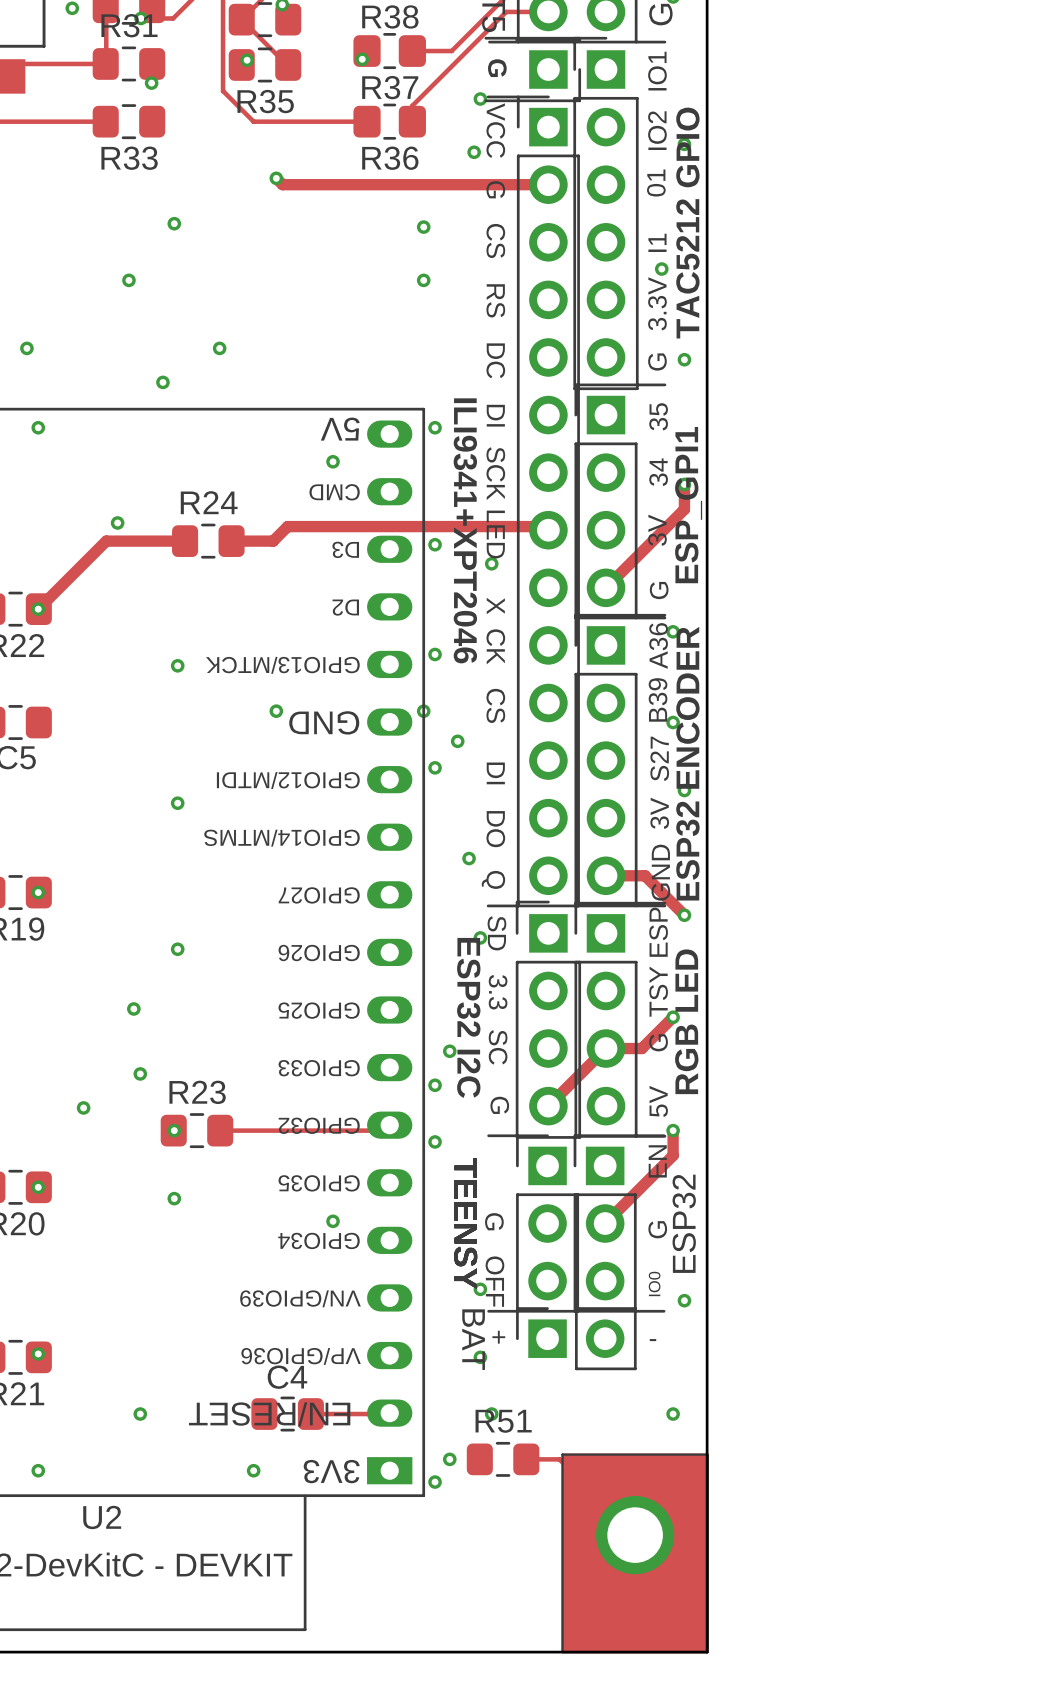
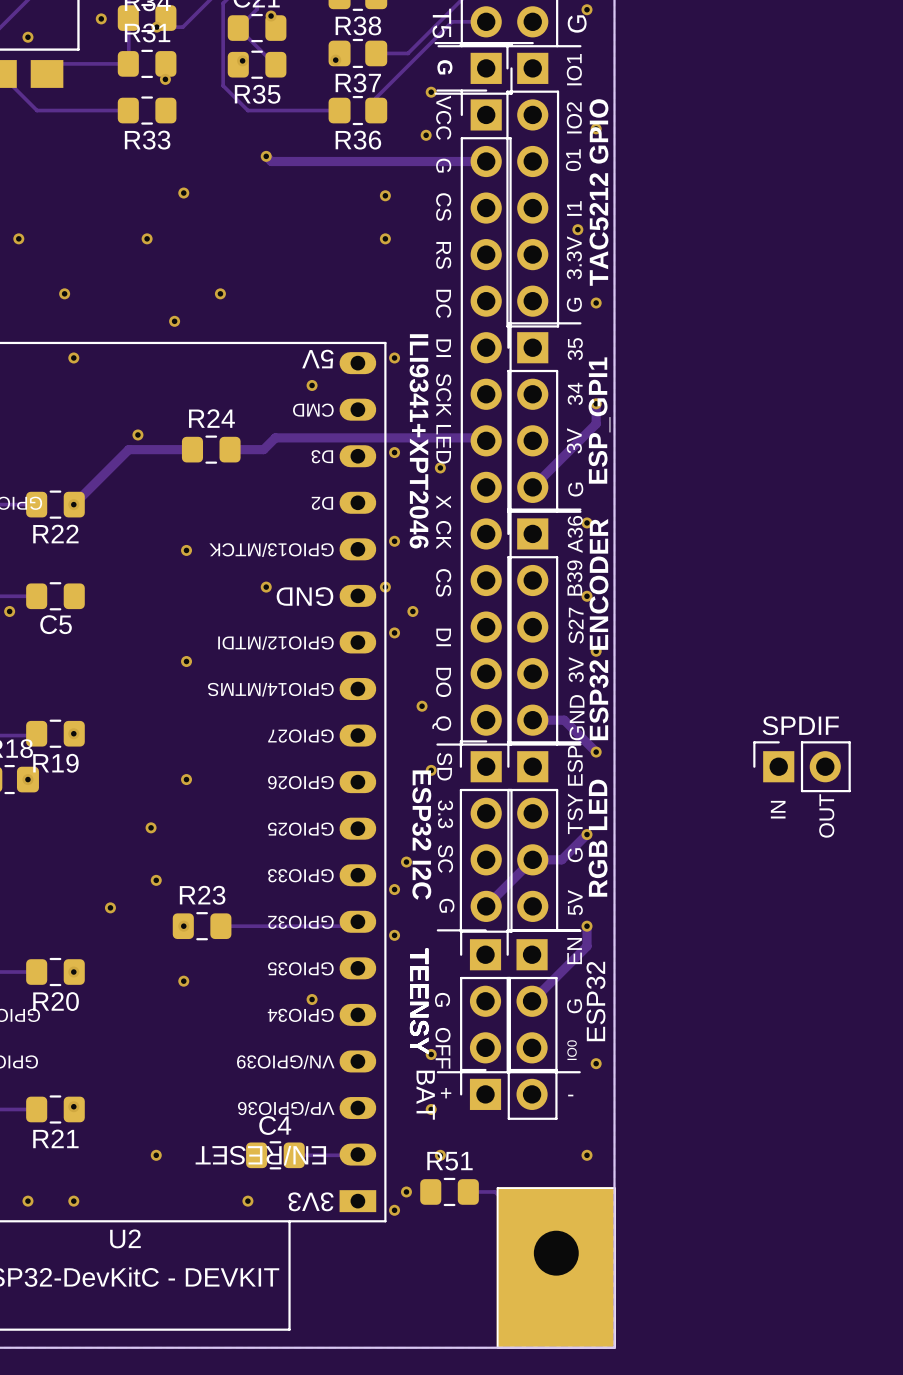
part: none -> (802, 766)

